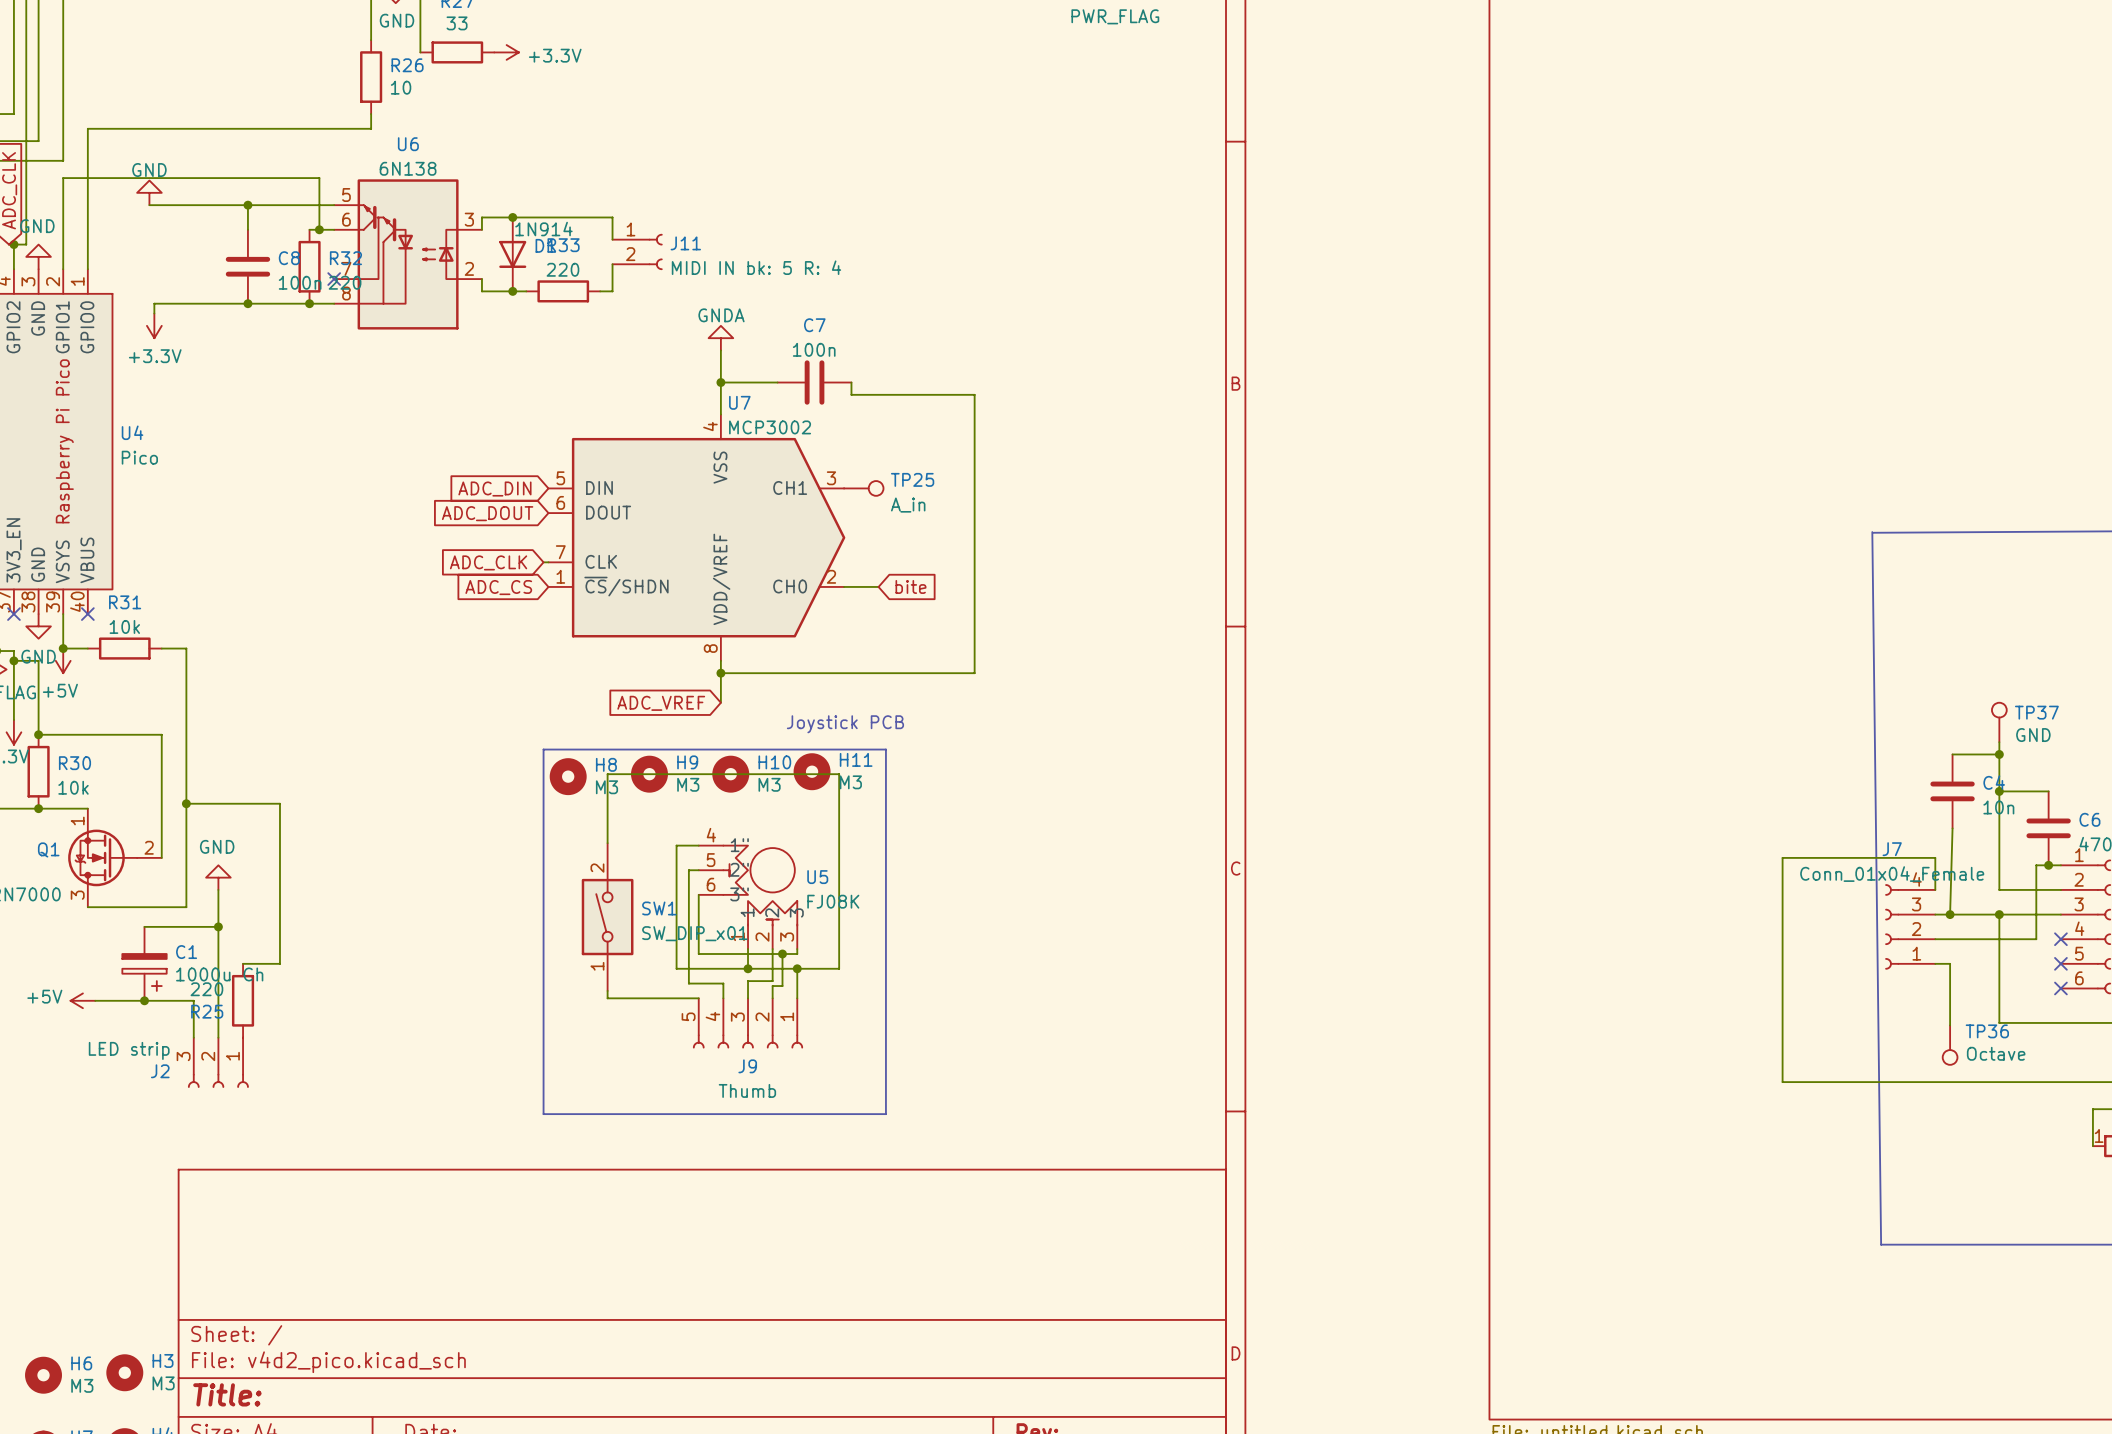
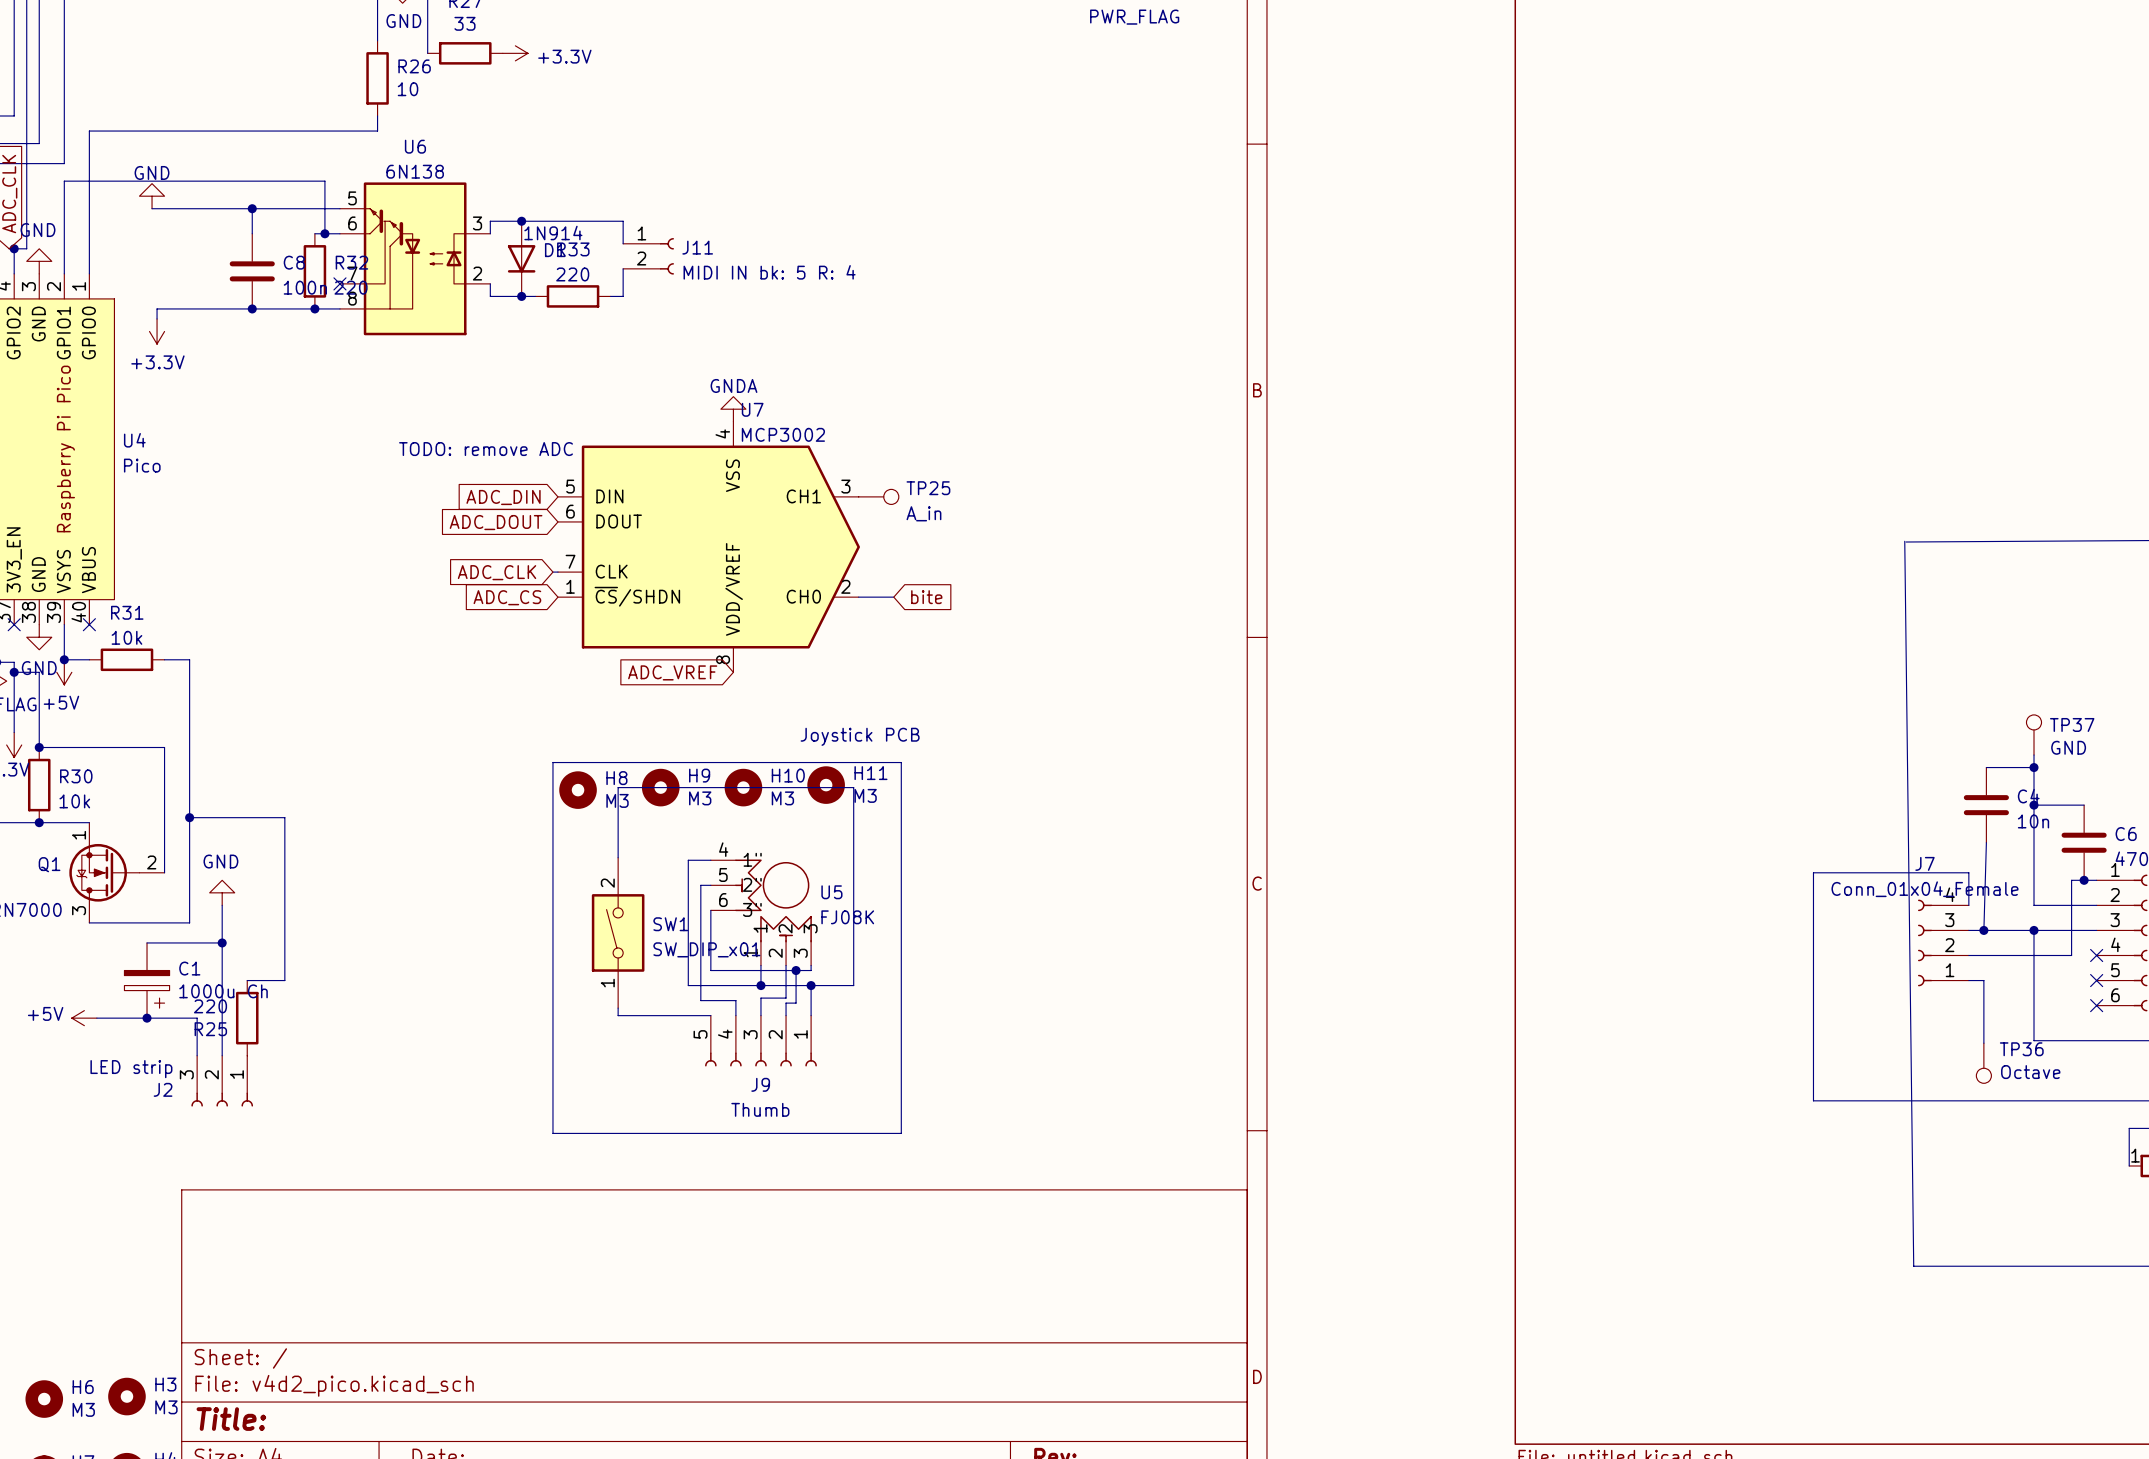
power symbol position: GNDA (720, 338) -> GNDA (733, 409)
wire: (720, 350) (720, 414) -> none
wire: (720, 382) (777, 382) -> none
junction: (720, 382) -> none
C7: 100n (814, 382) -> none
wire: (851, 382) (851, 394) (974, 394) (974, 673) (720, 673) -> none
text: none -> TODO: remove ADC (486, 449)
wire: (720, 660) (720, 702) -> none
junction: (720, 673) -> none
global label position: ADC_VREF (661, 703) -> ADC_VREF (672, 672)

